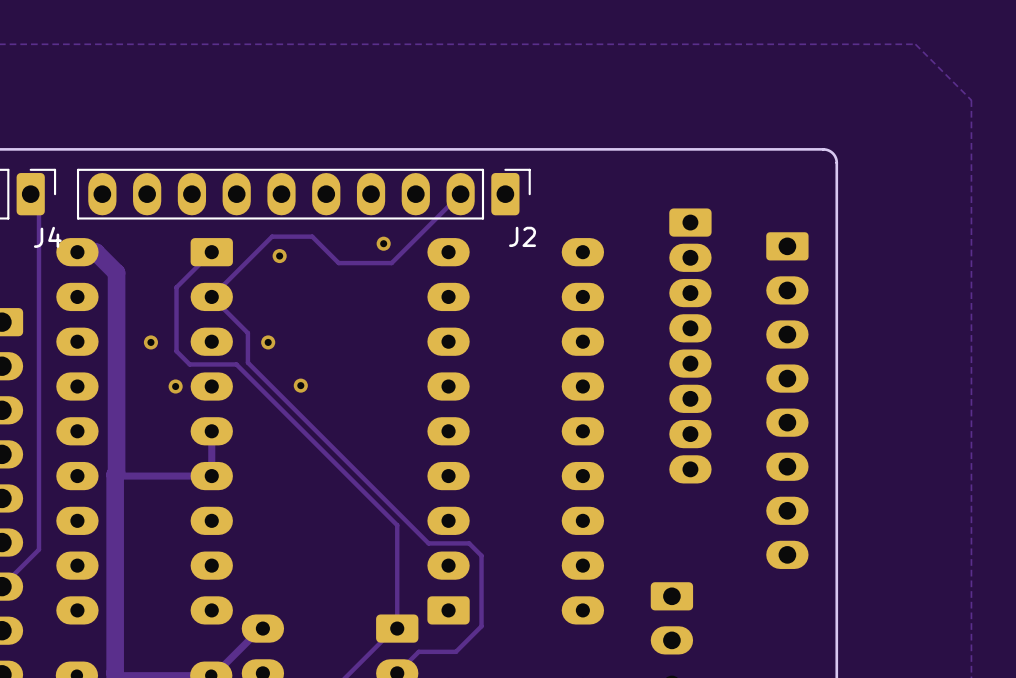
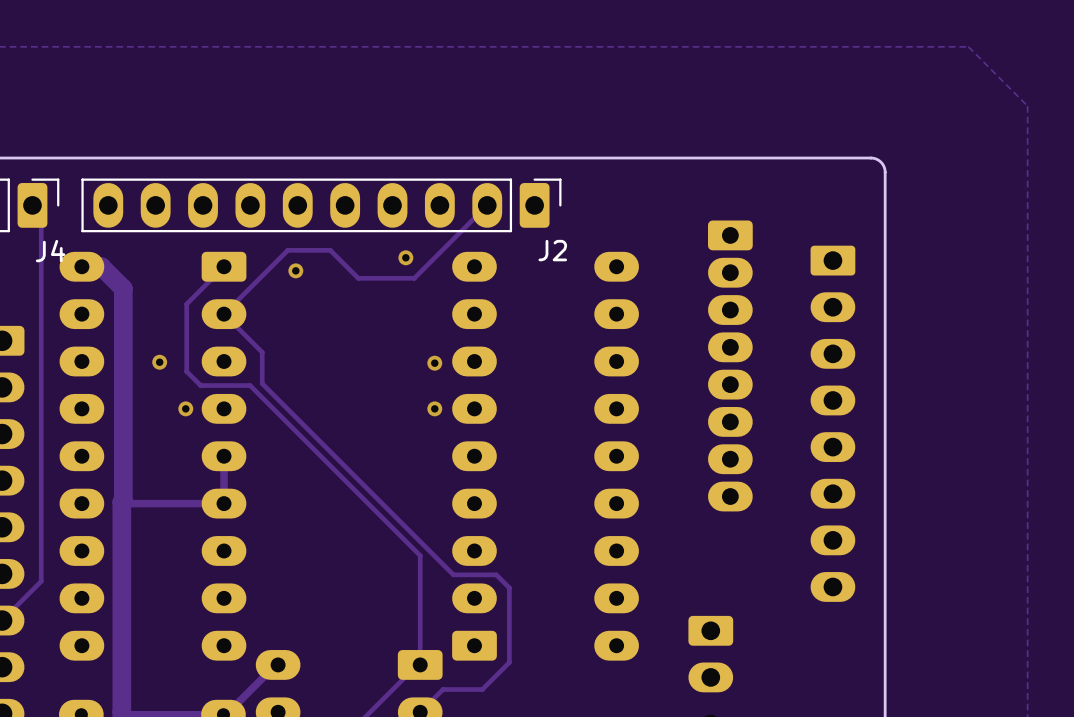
via: (268, 342) -> none
via: none -> (434, 363)
via: (300, 385) -> none
via: none -> (434, 408)

